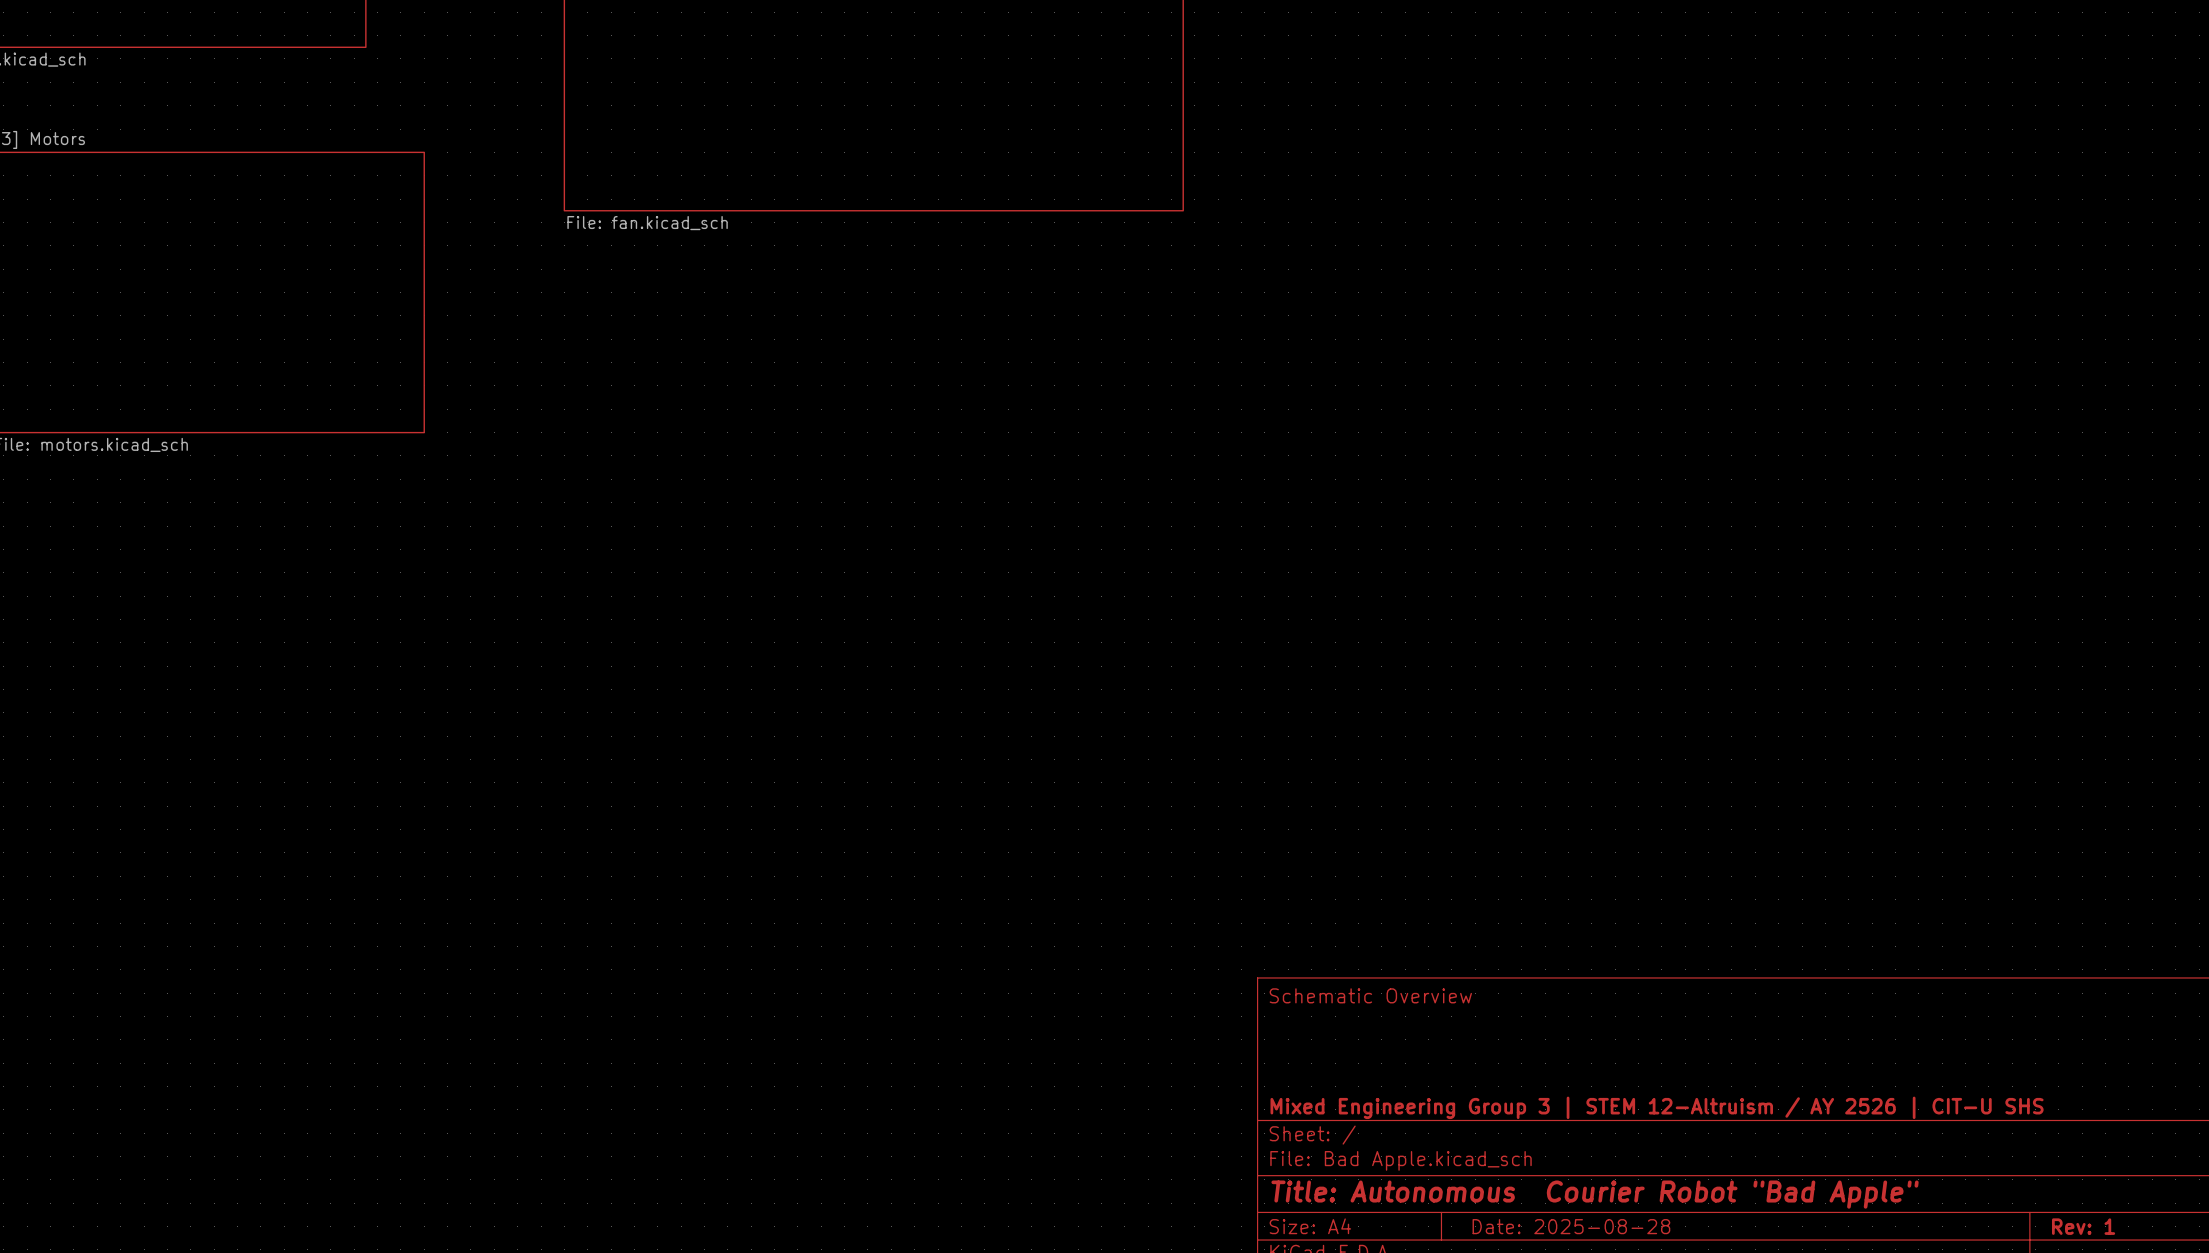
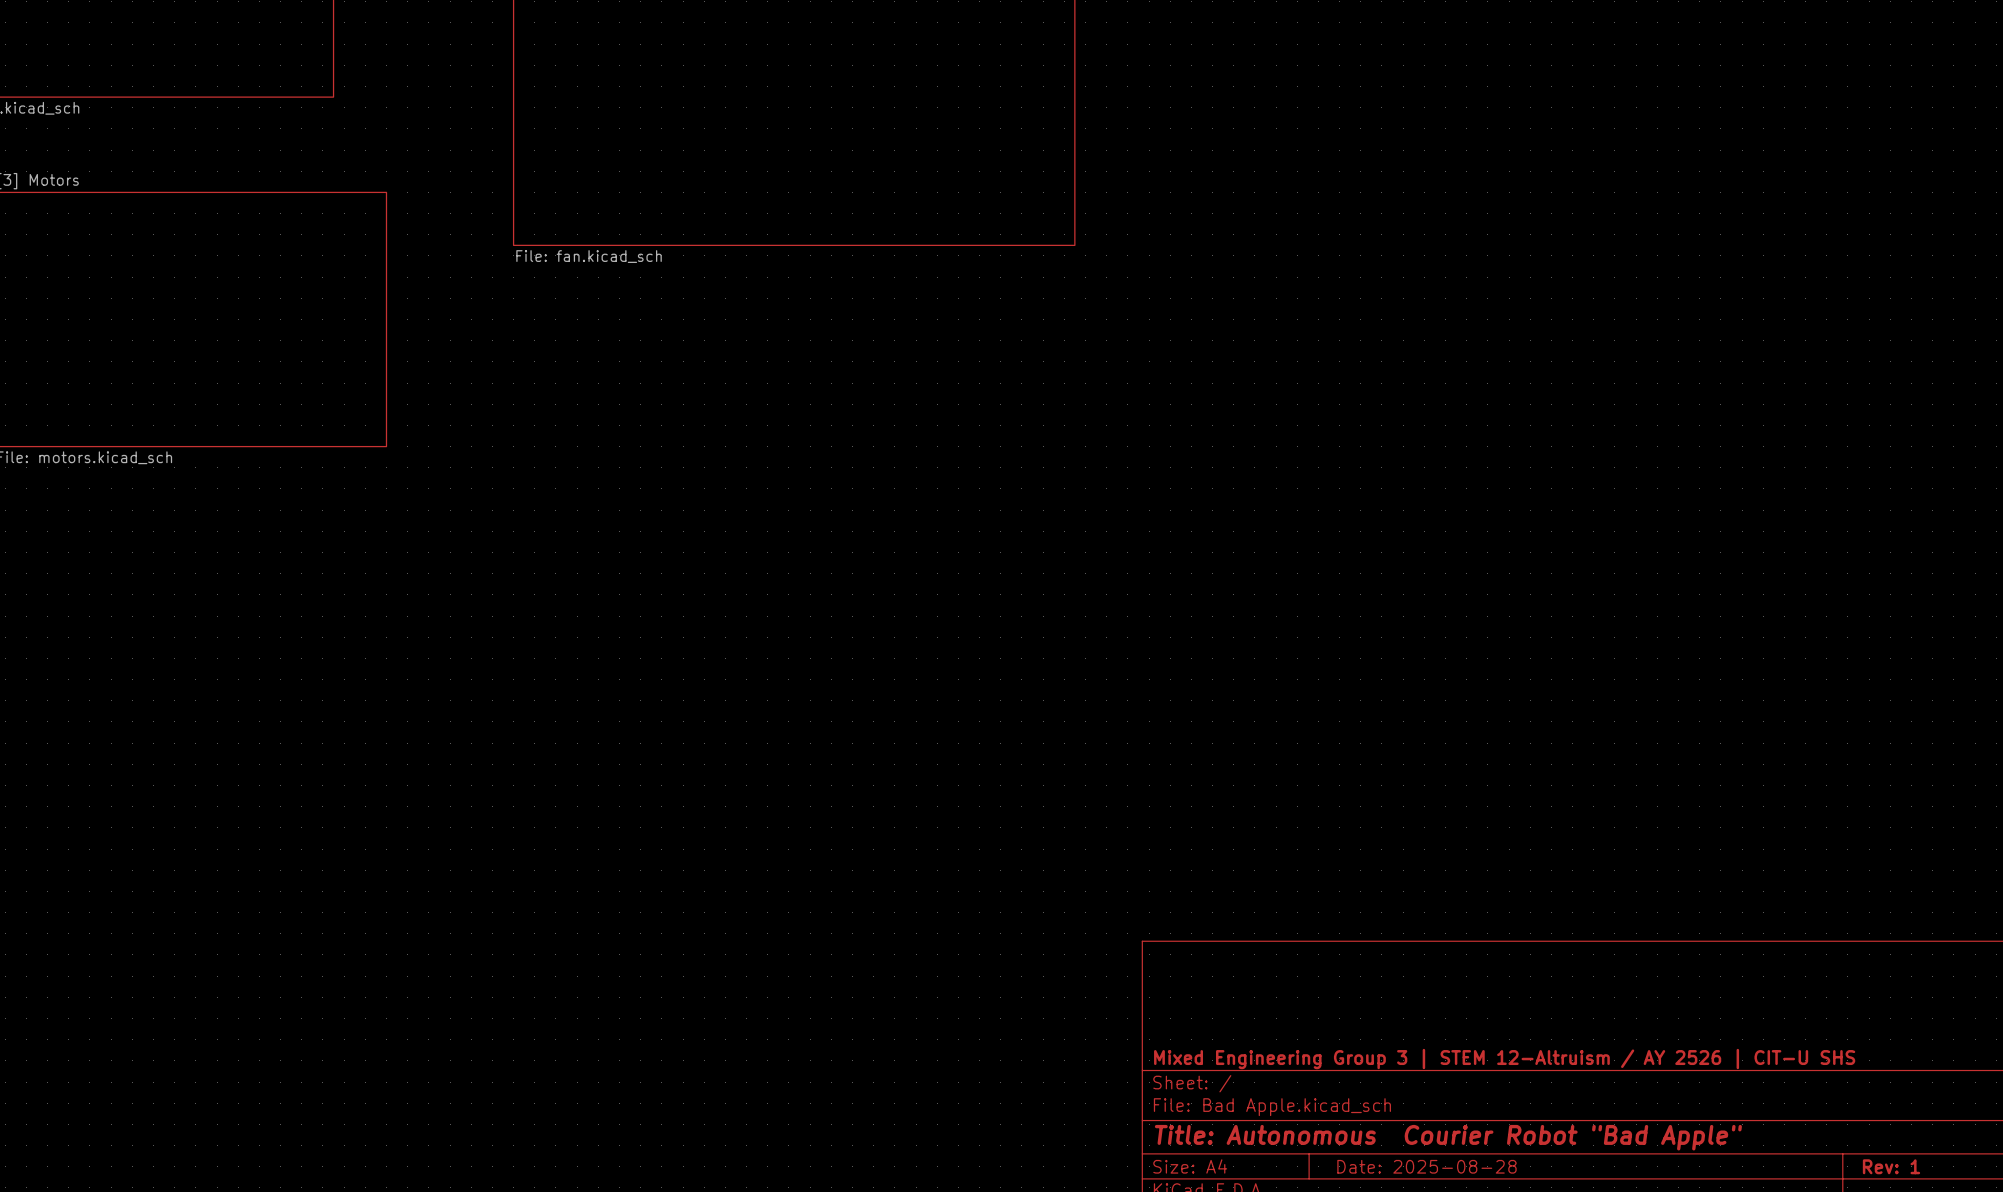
title block: Schematic Overview (1370, 995) -> none

